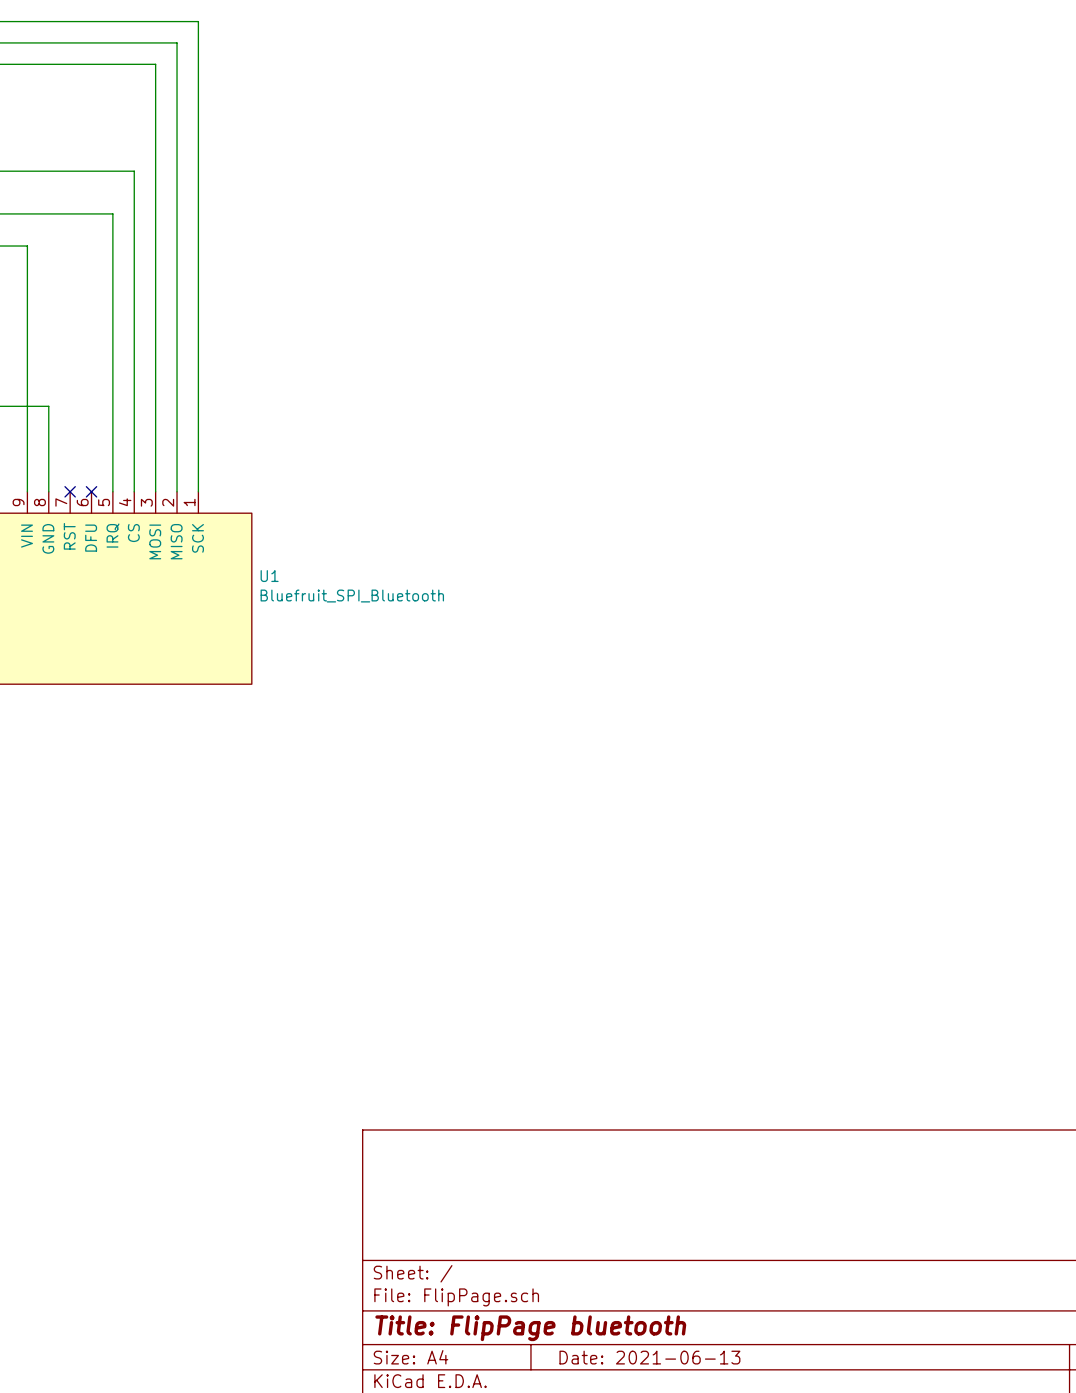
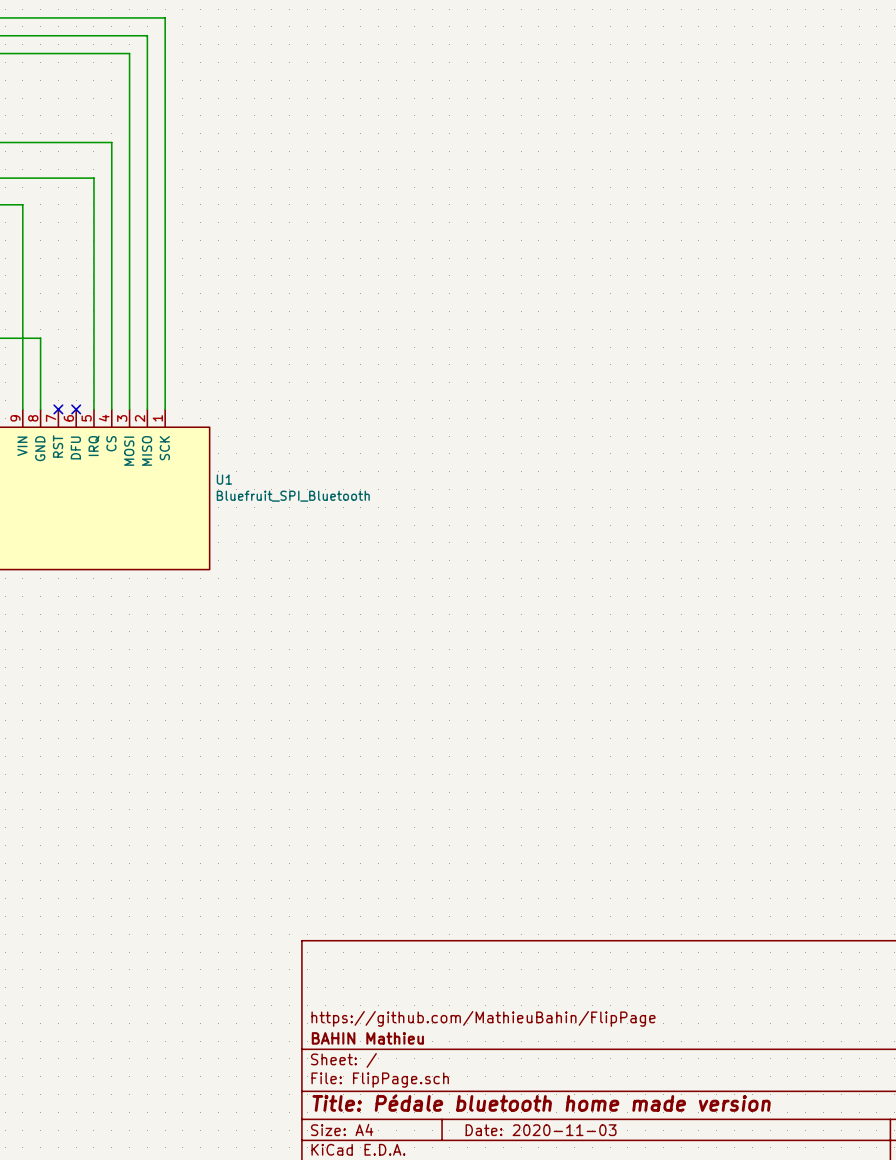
title block: none -> https://github.com/MathieuBahin/FlipPage (483, 1018)
title block: none -> BAHIN Mathieu (367, 1038)
title block: Title: FlipPage bluetooth (530, 1328) -> Title: Pédale bluetooth home made version (541, 1103)
title block: Date: 2021-06-13 (649, 1357) -> Date: 2020-11-03 (541, 1130)

